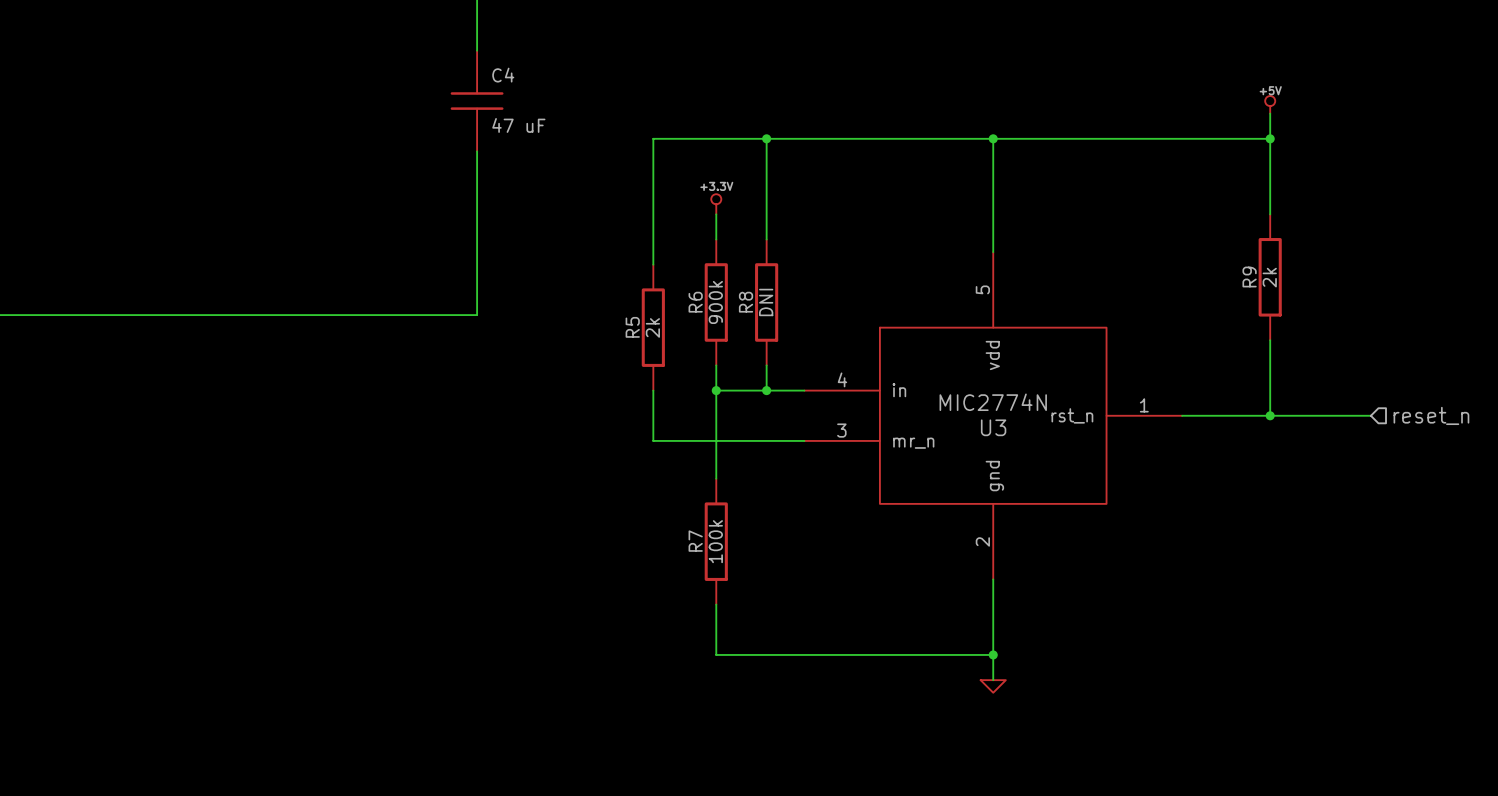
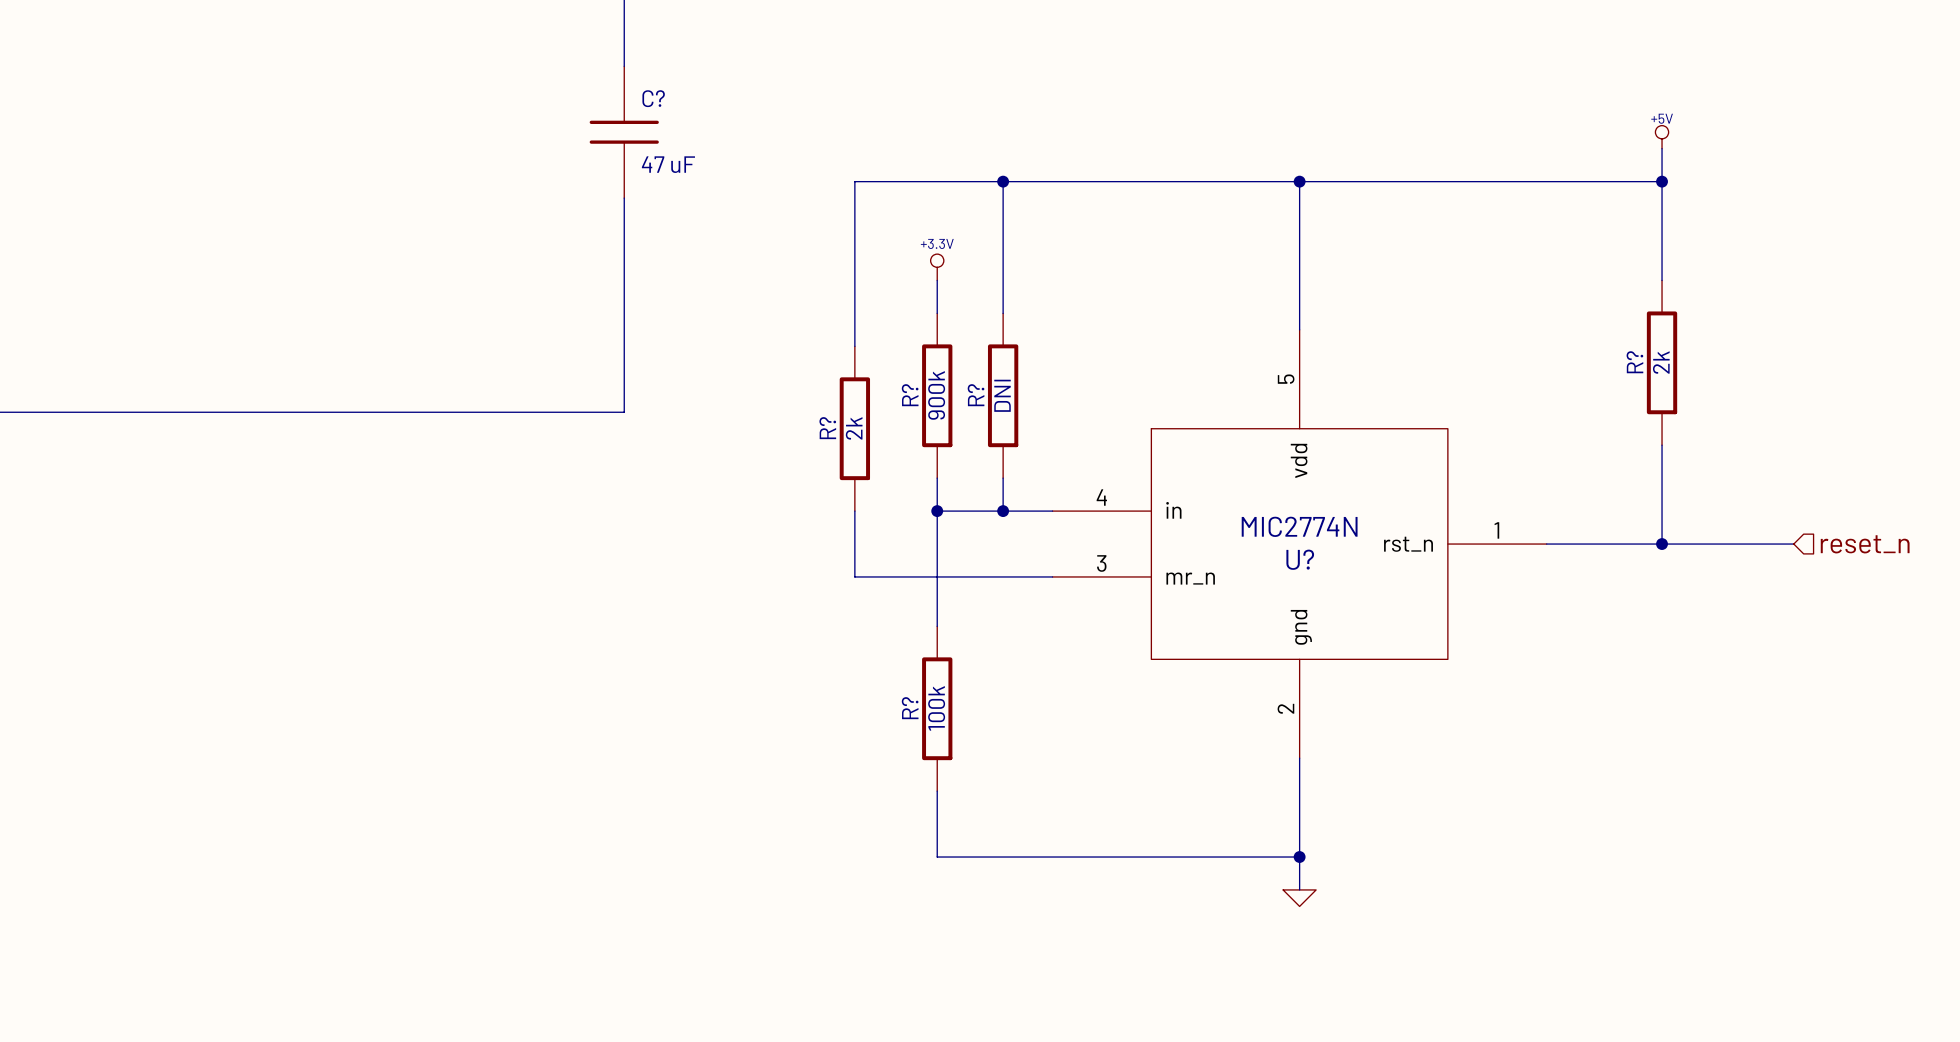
C4 name: C4 (503, 75) -> C? (653, 98)
R9 name: R9 (1249, 277) -> R? (1634, 362)
R6 name: R6 (695, 302) -> R? (910, 395)
R8 name: R8 (746, 302) -> R? (976, 395)
R5 name: R5 (632, 327) -> R? (827, 428)
U3 name: U3 (993, 427) -> U? (1300, 559)
R7 name: R7 (695, 541) -> R? (910, 708)

